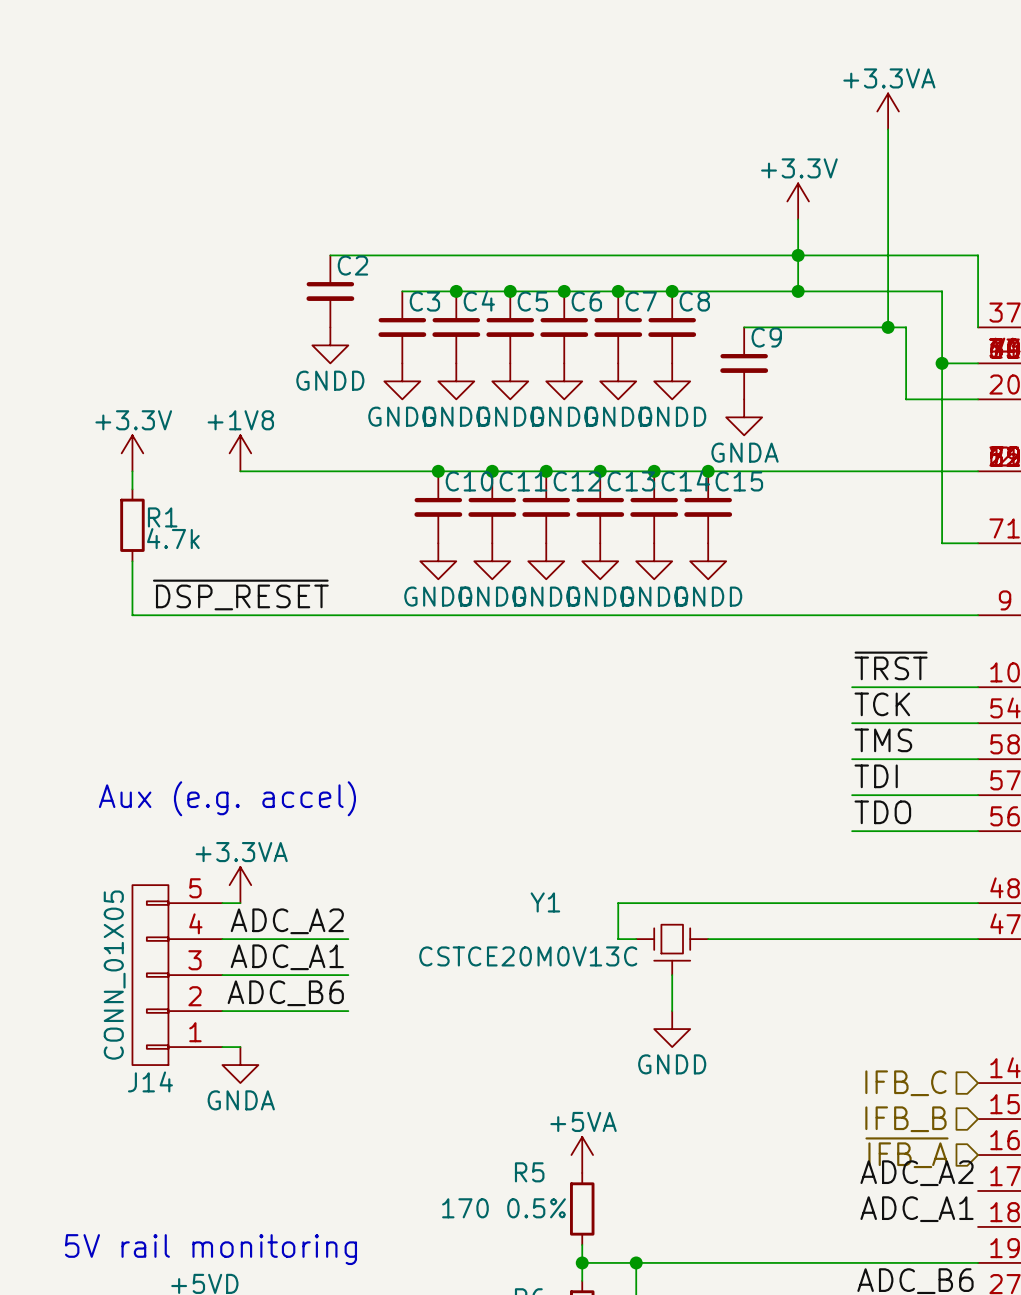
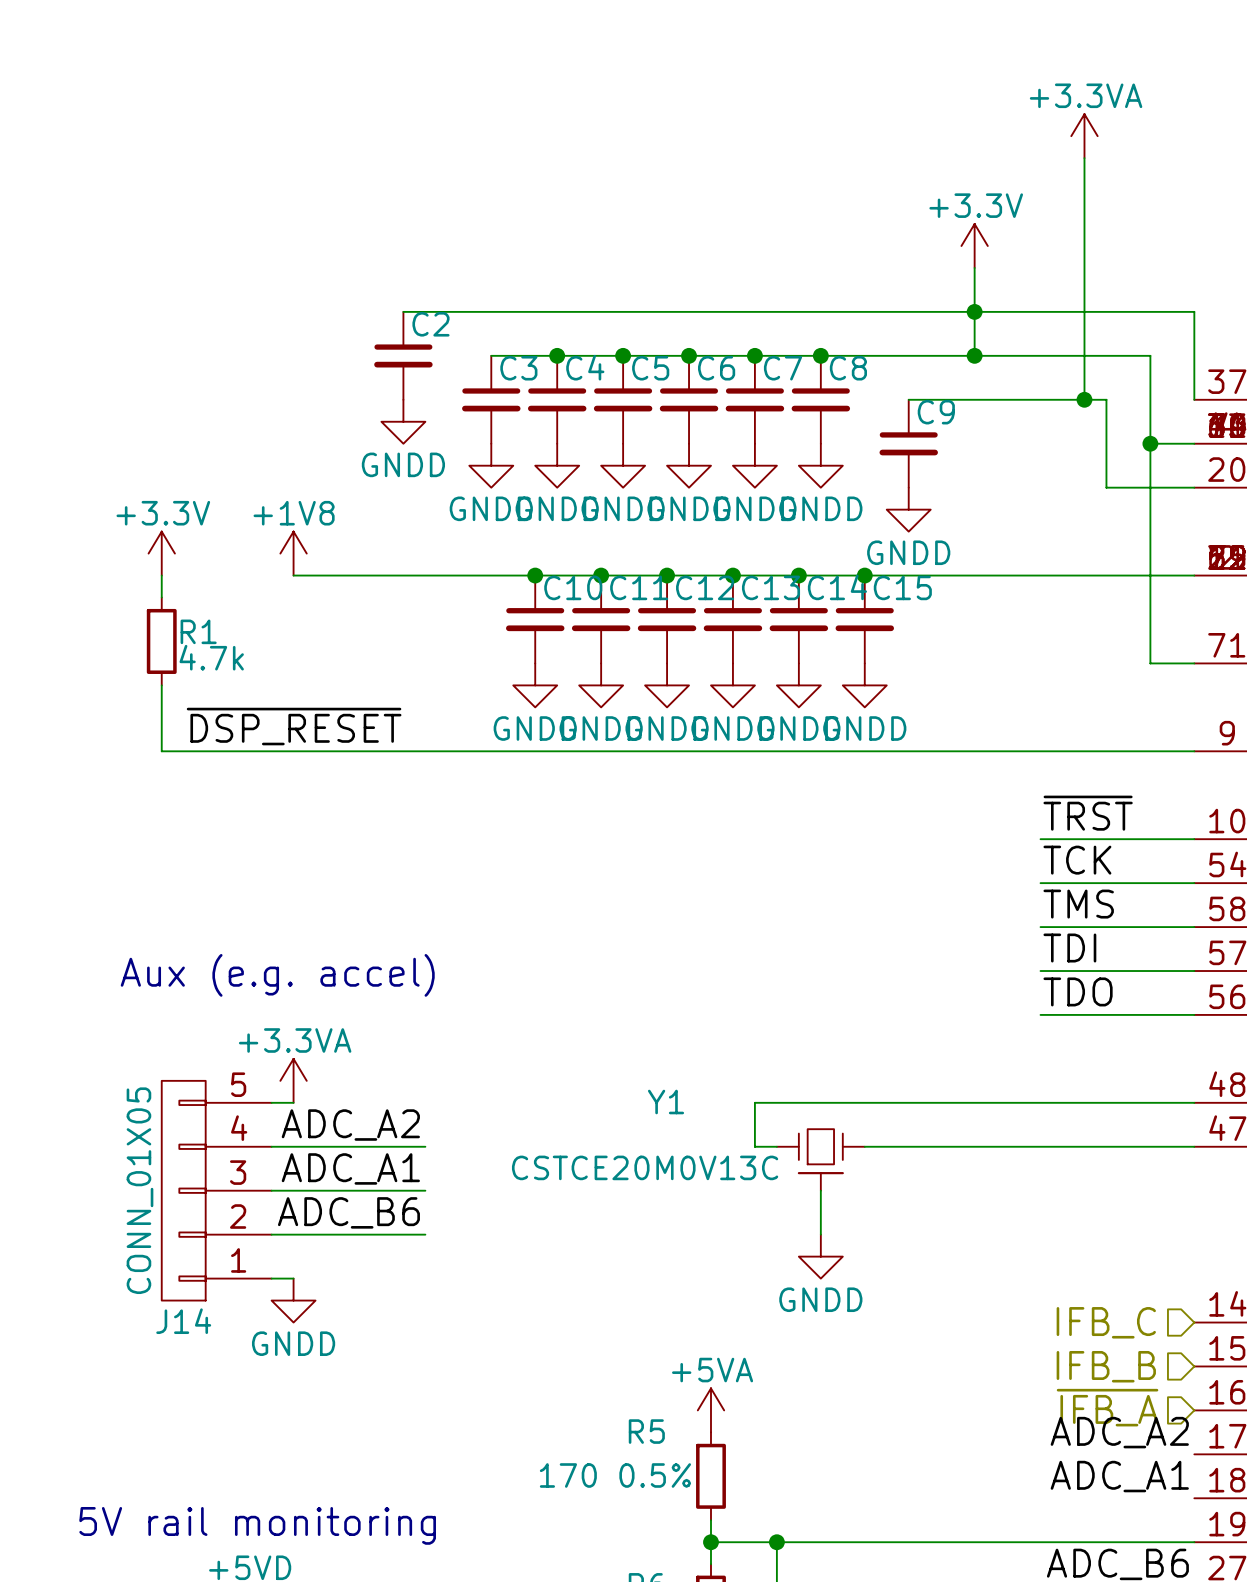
power symbol: GNDA (744, 417) -> GNDD (908, 509)
power symbol: GNDA (240, 1065) -> GNDD (293, 1300)

